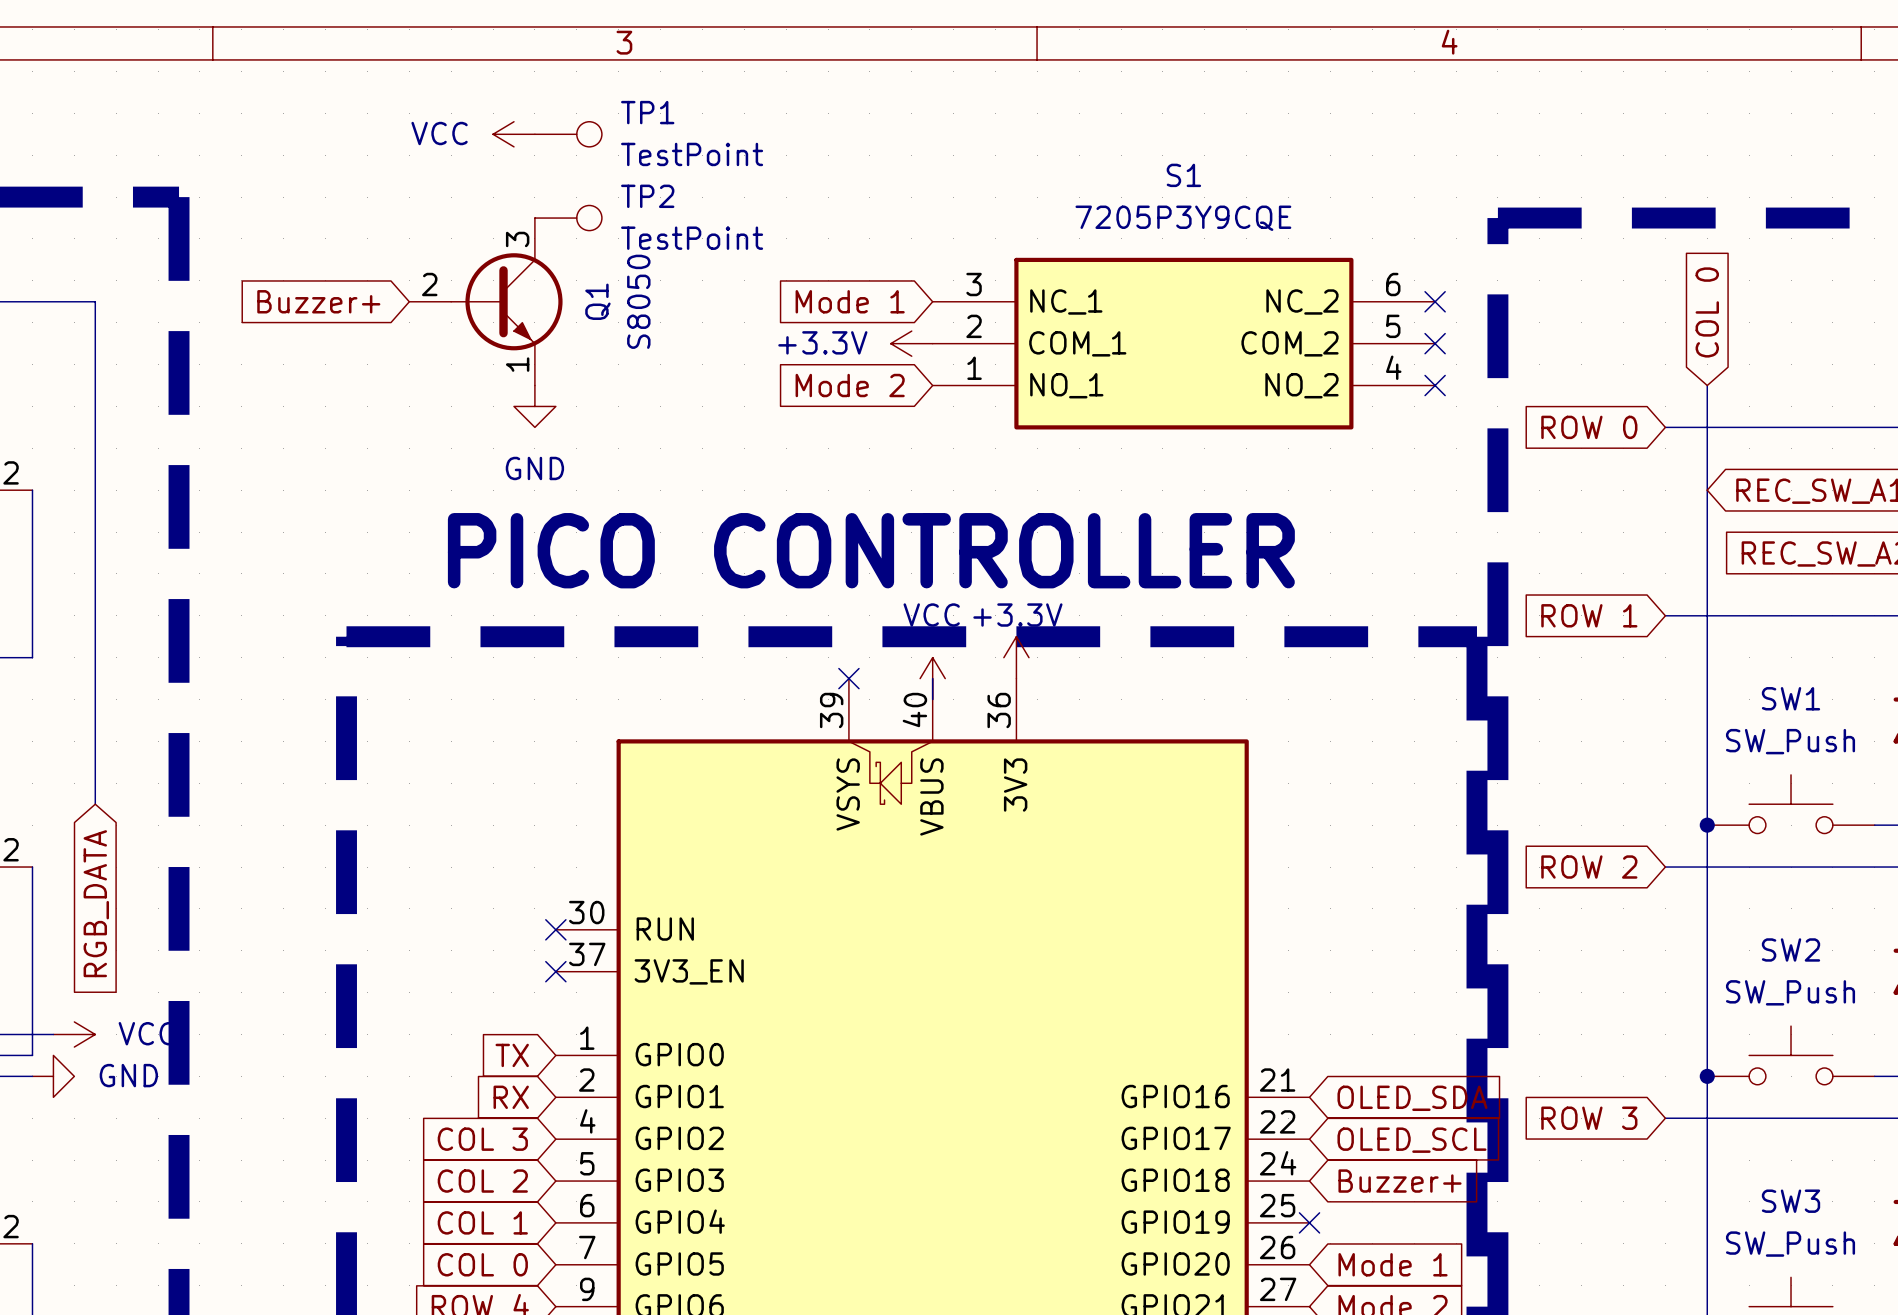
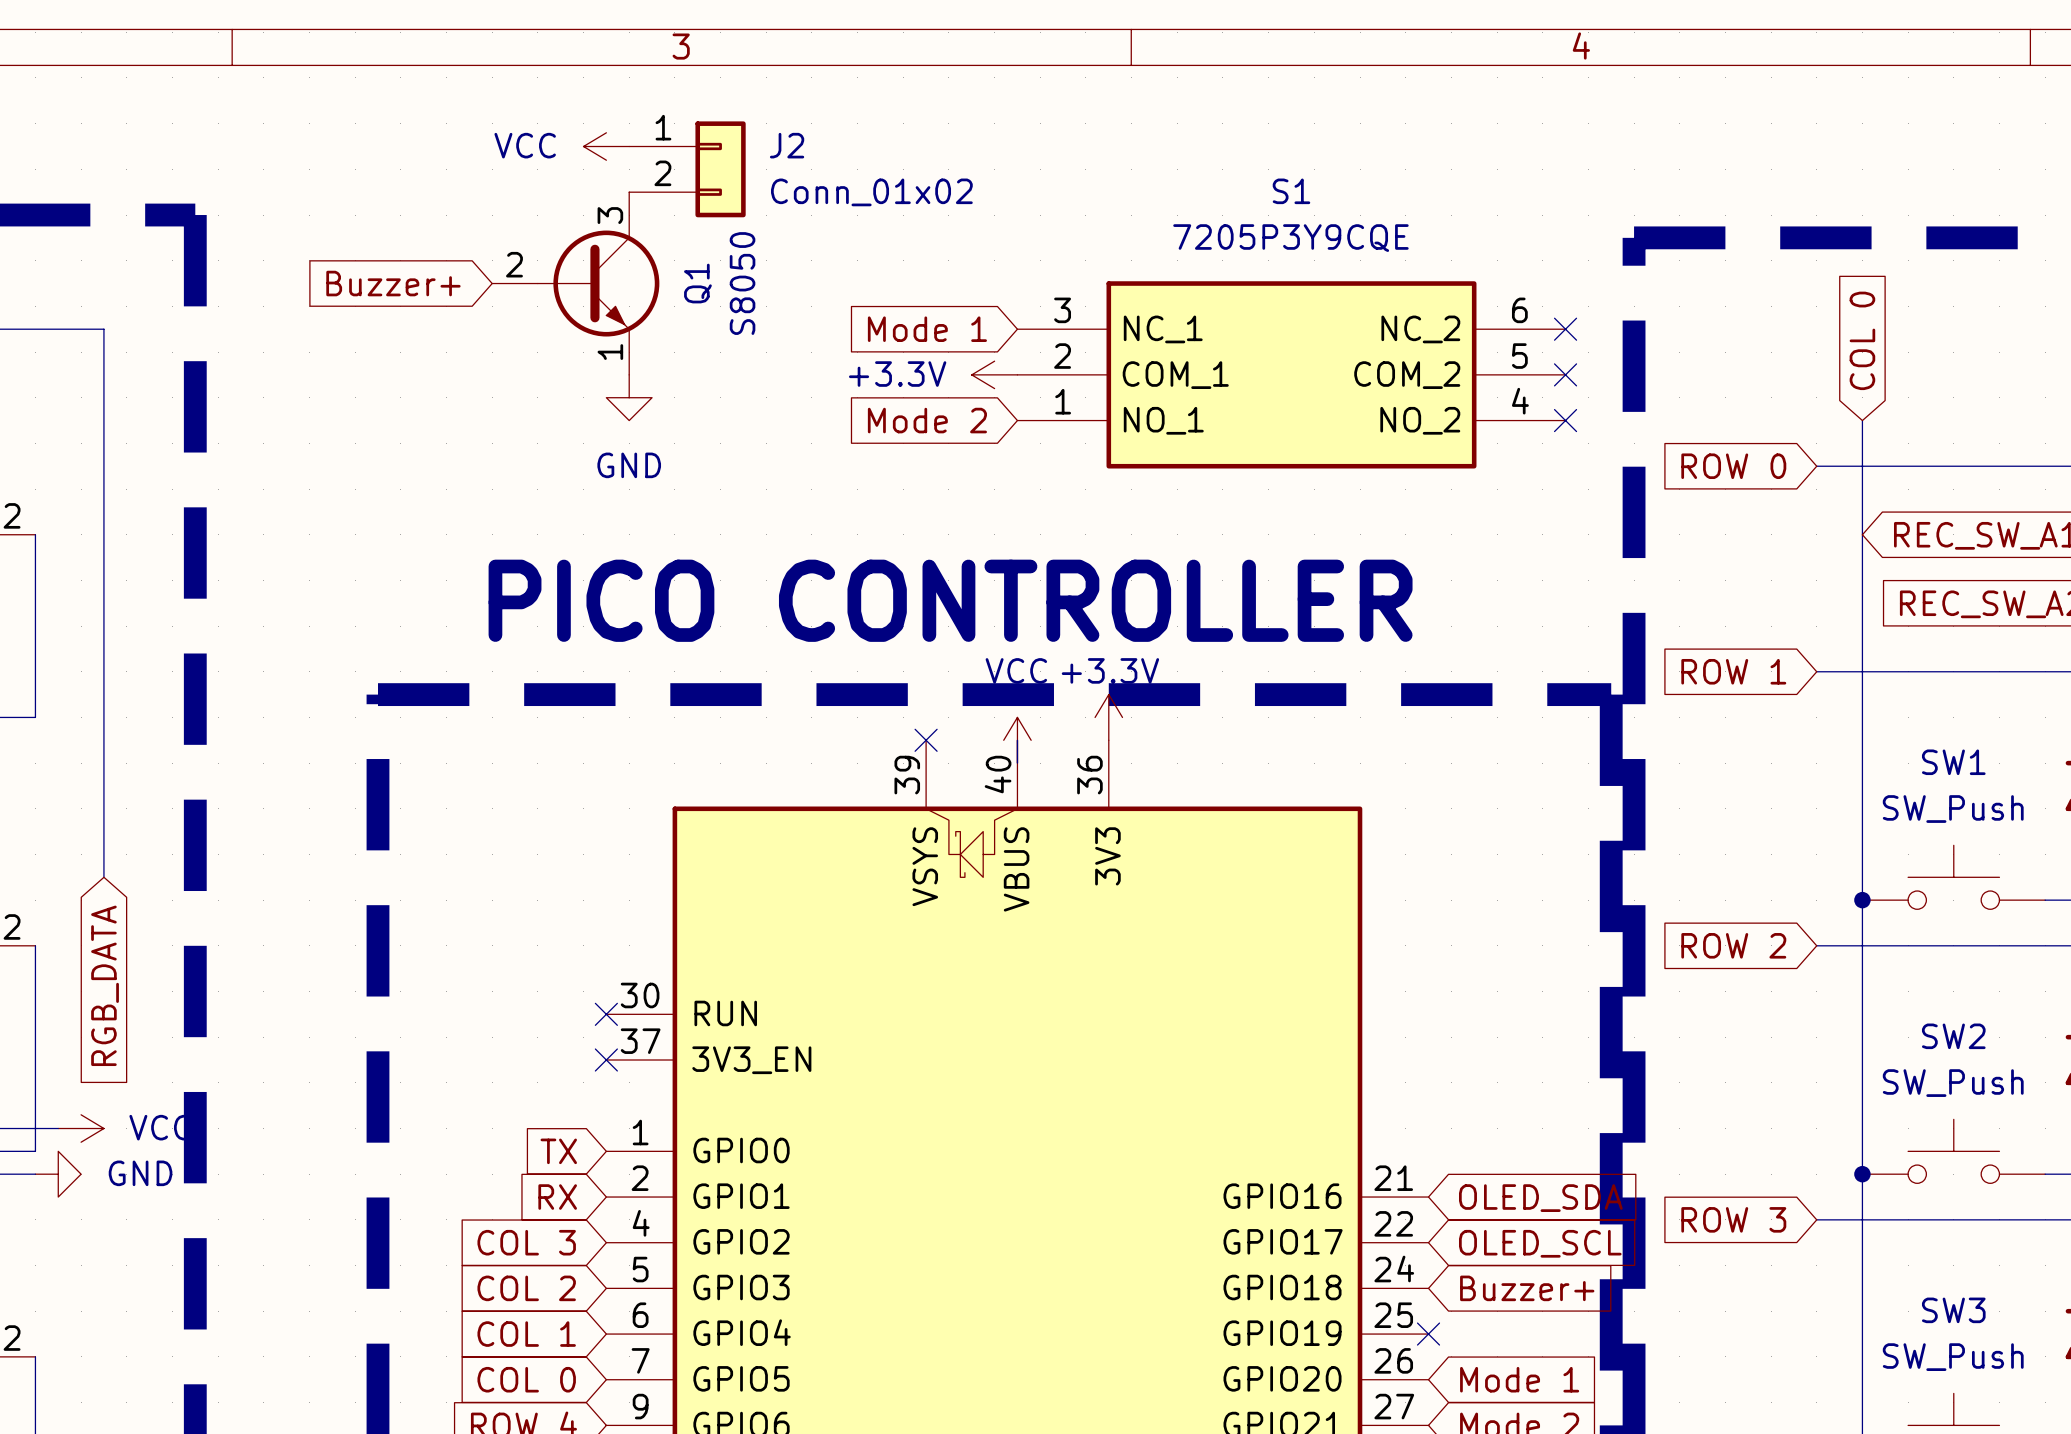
power symbol position: VCC (513, 134) -> VCC (606, 146)
TP1: TestPoint (568, 134) -> none
J2: none -> Conn_01x02 (687, 169)
TP2: TestPoint (568, 218) -> none
global label position: Buzzer+ (318, 301) -> Buzzer+ (393, 283)
Q1 position: (485, 301) -> (575, 283)
power symbol position: GND (534, 406) -> GND (629, 397)

